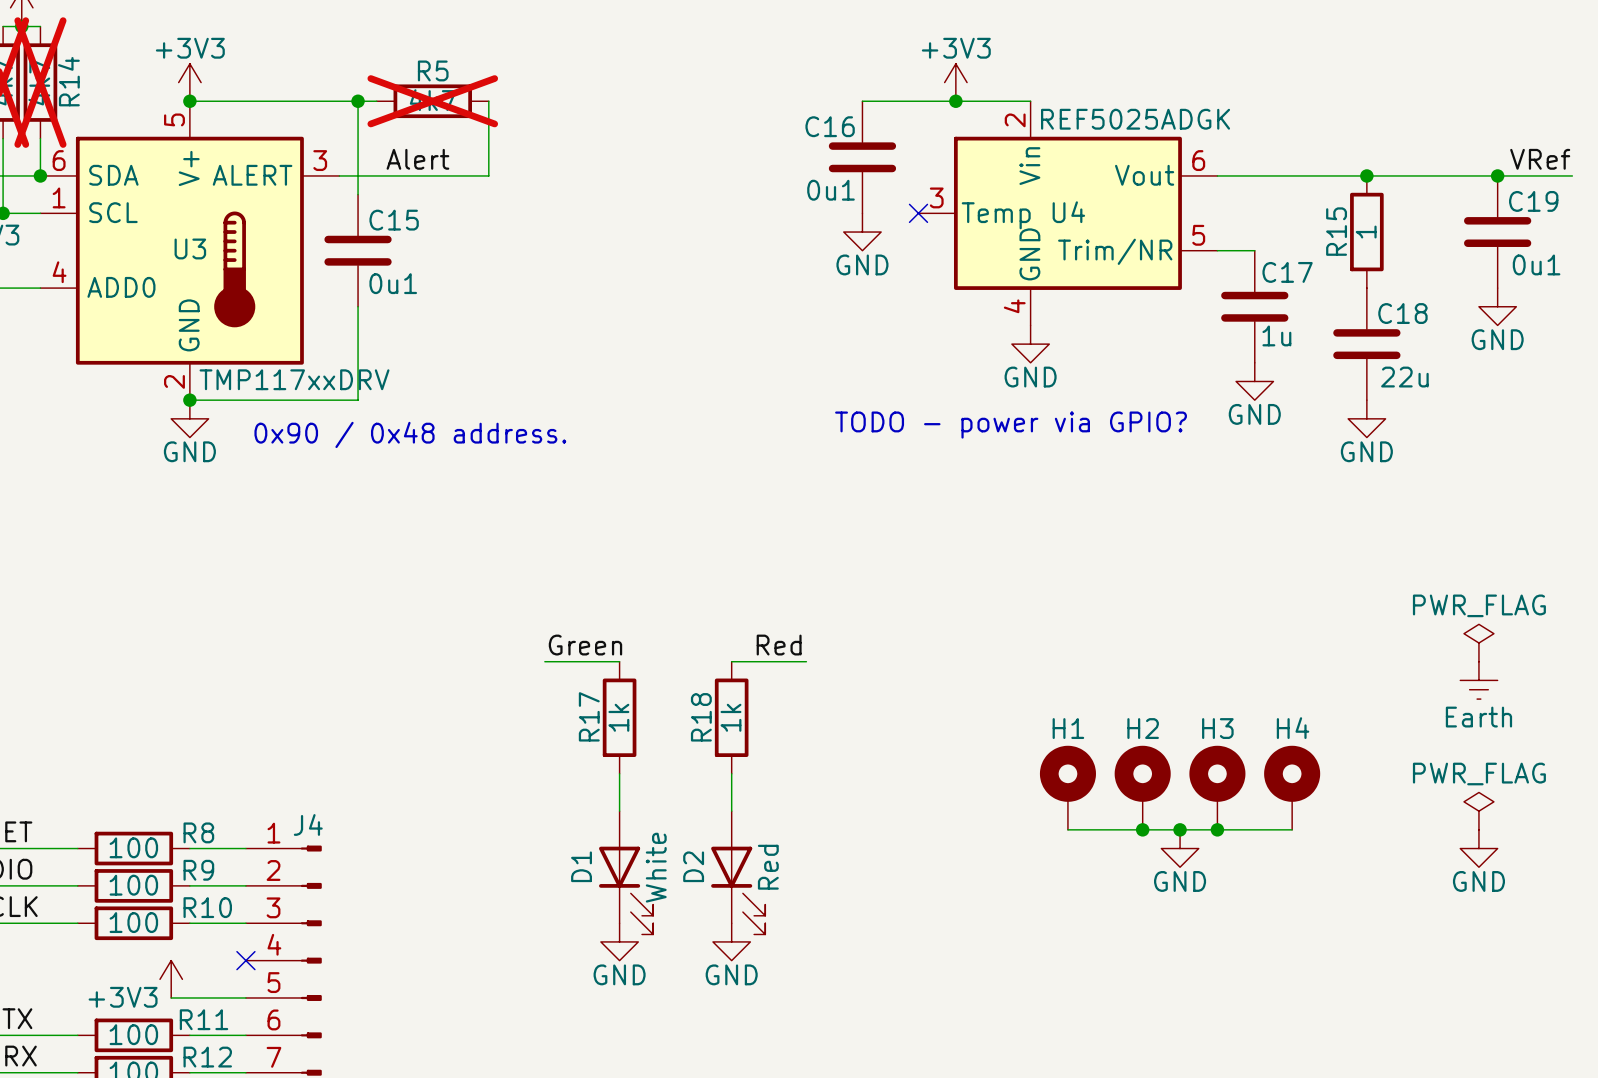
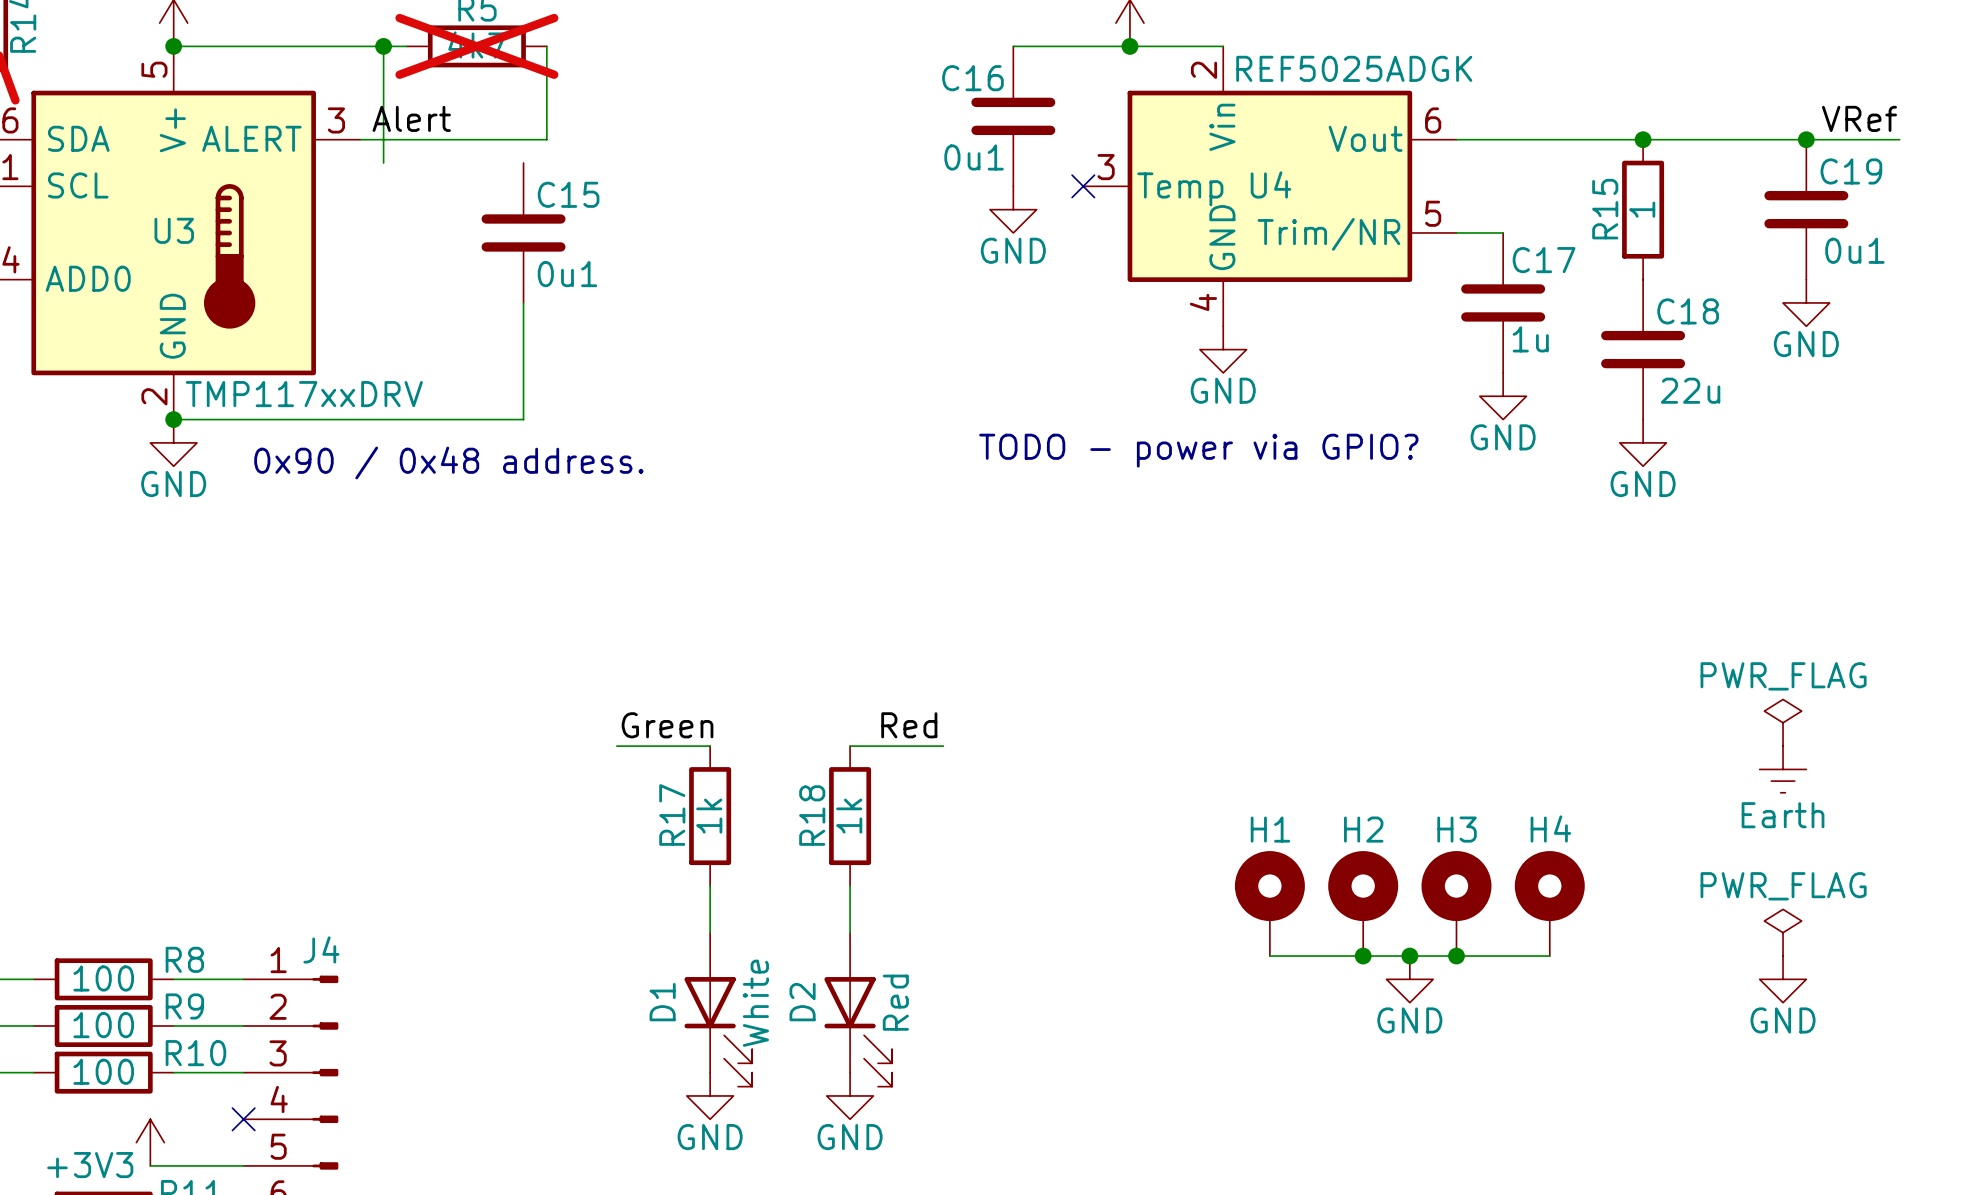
label position: Alert (417, 159) -> Alert (411, 118)
C15 position: (358, 250) -> (523, 232)
wire: (358, 306) (358, 400) -> (523, 302) (523, 419) (383, 419)

